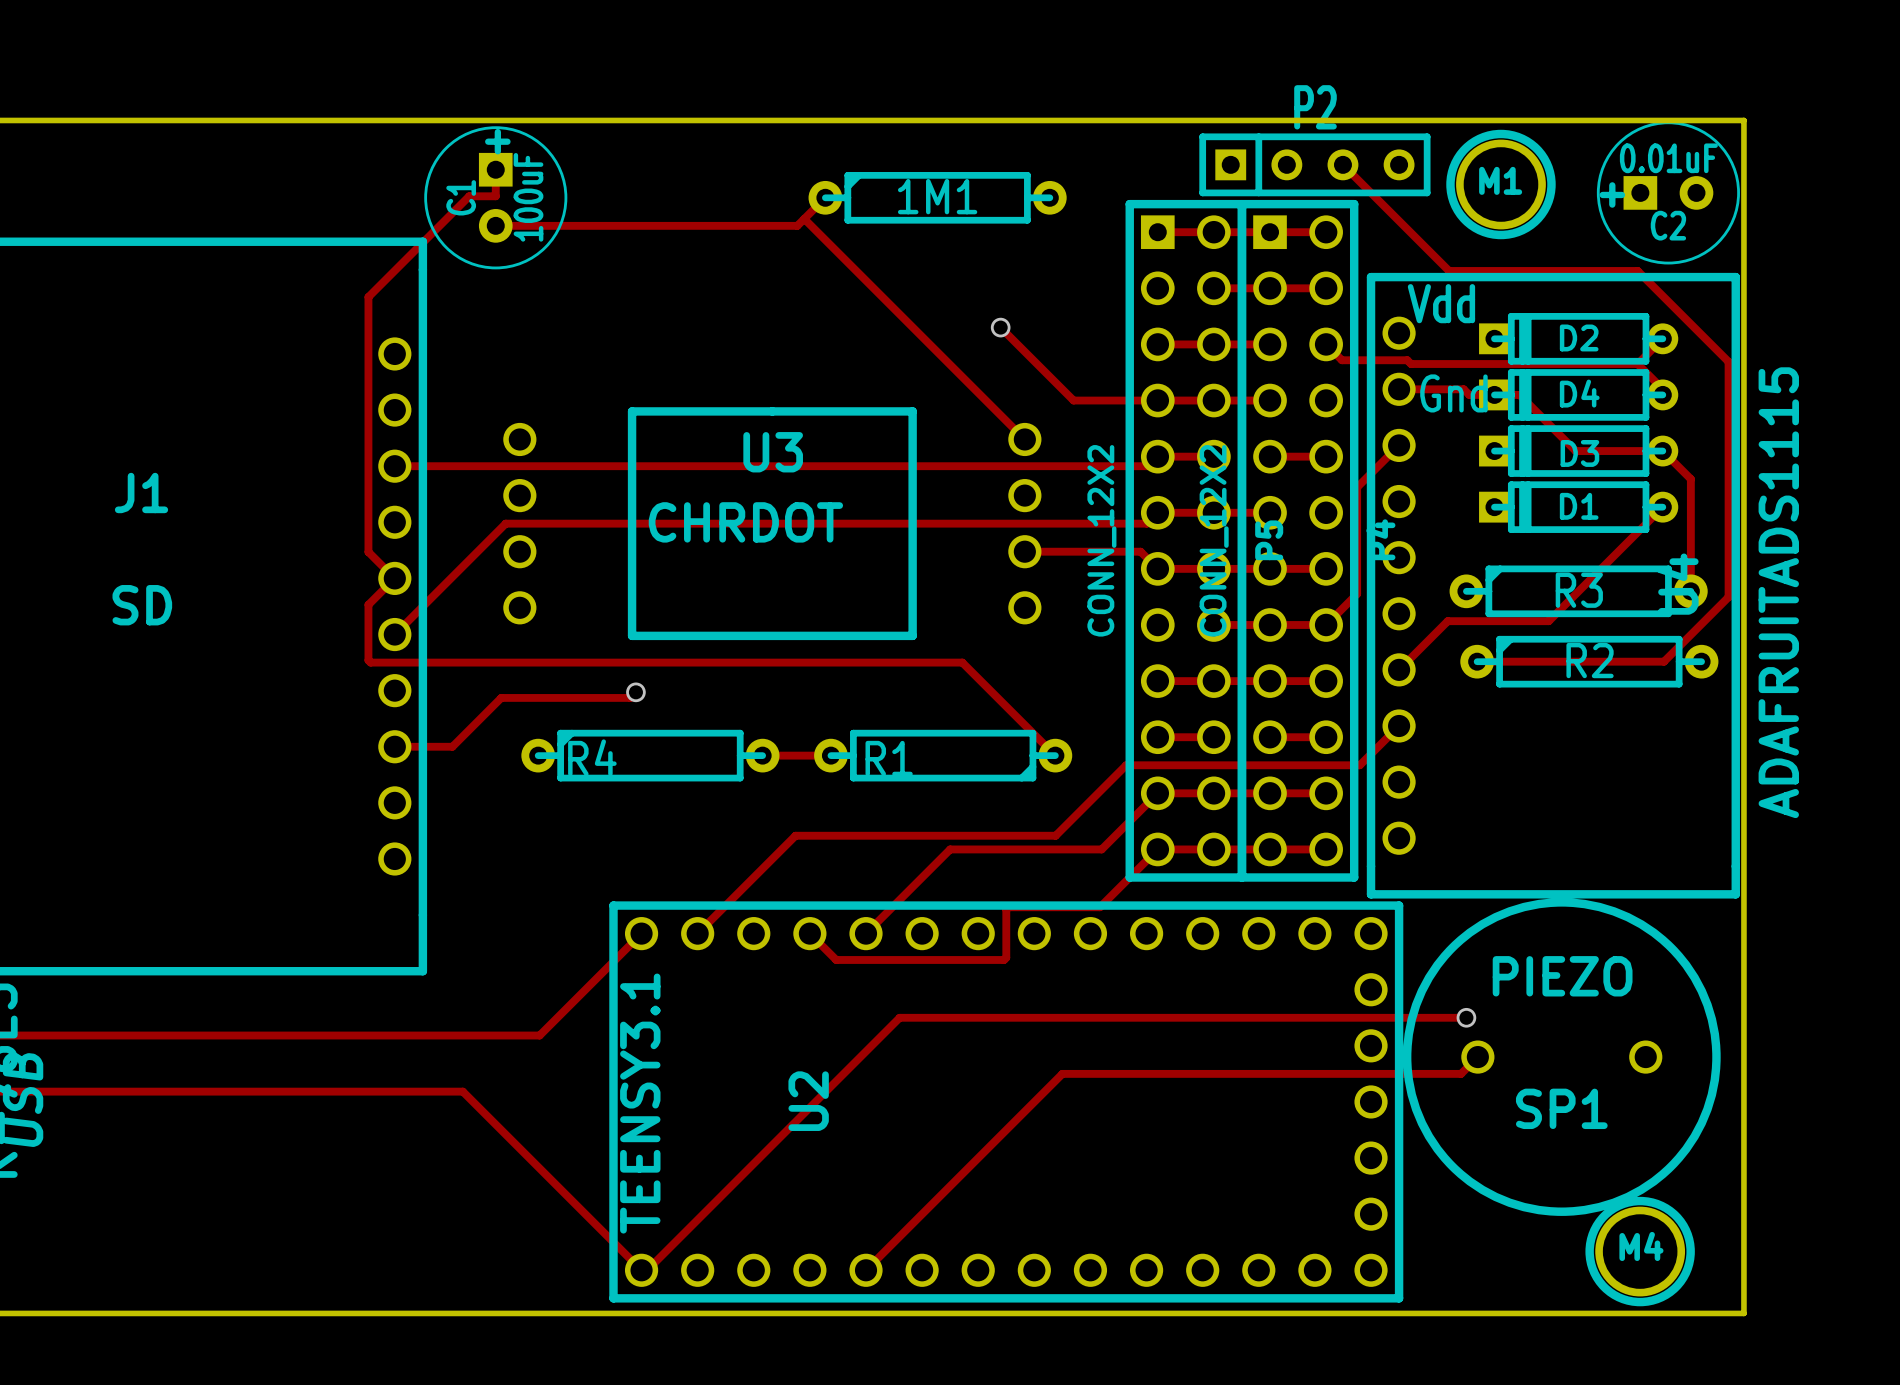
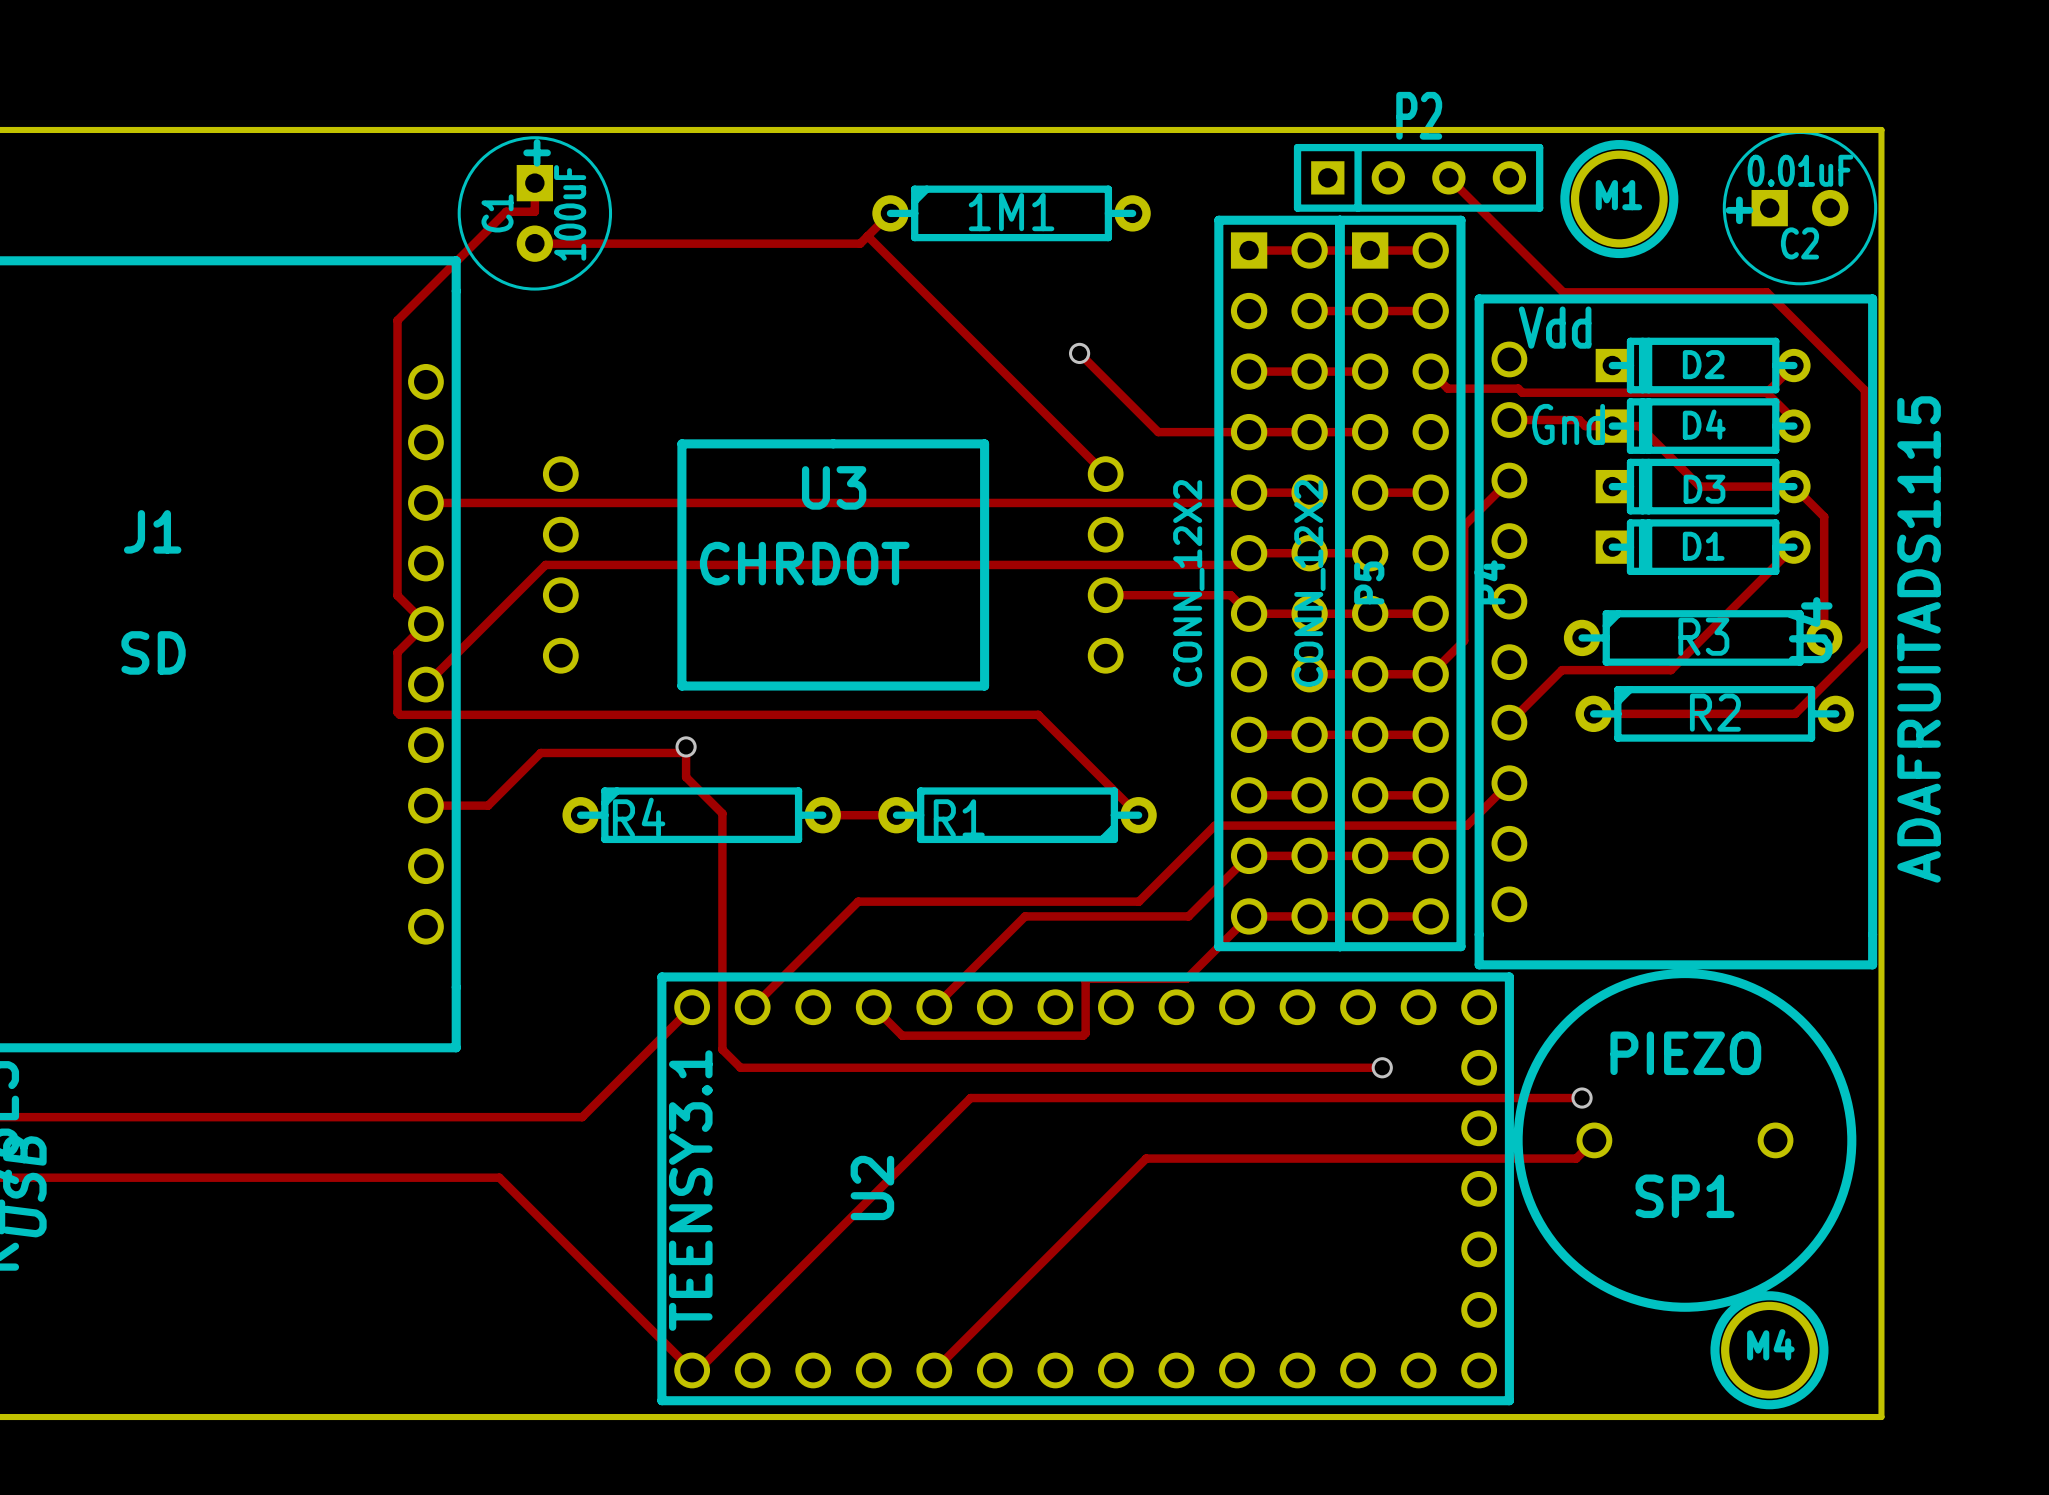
track: none -> (686, 746) (686, 777) (722, 813) (722, 1049) (740, 1067) (1382, 1067)
via: none -> (1382, 1067)

